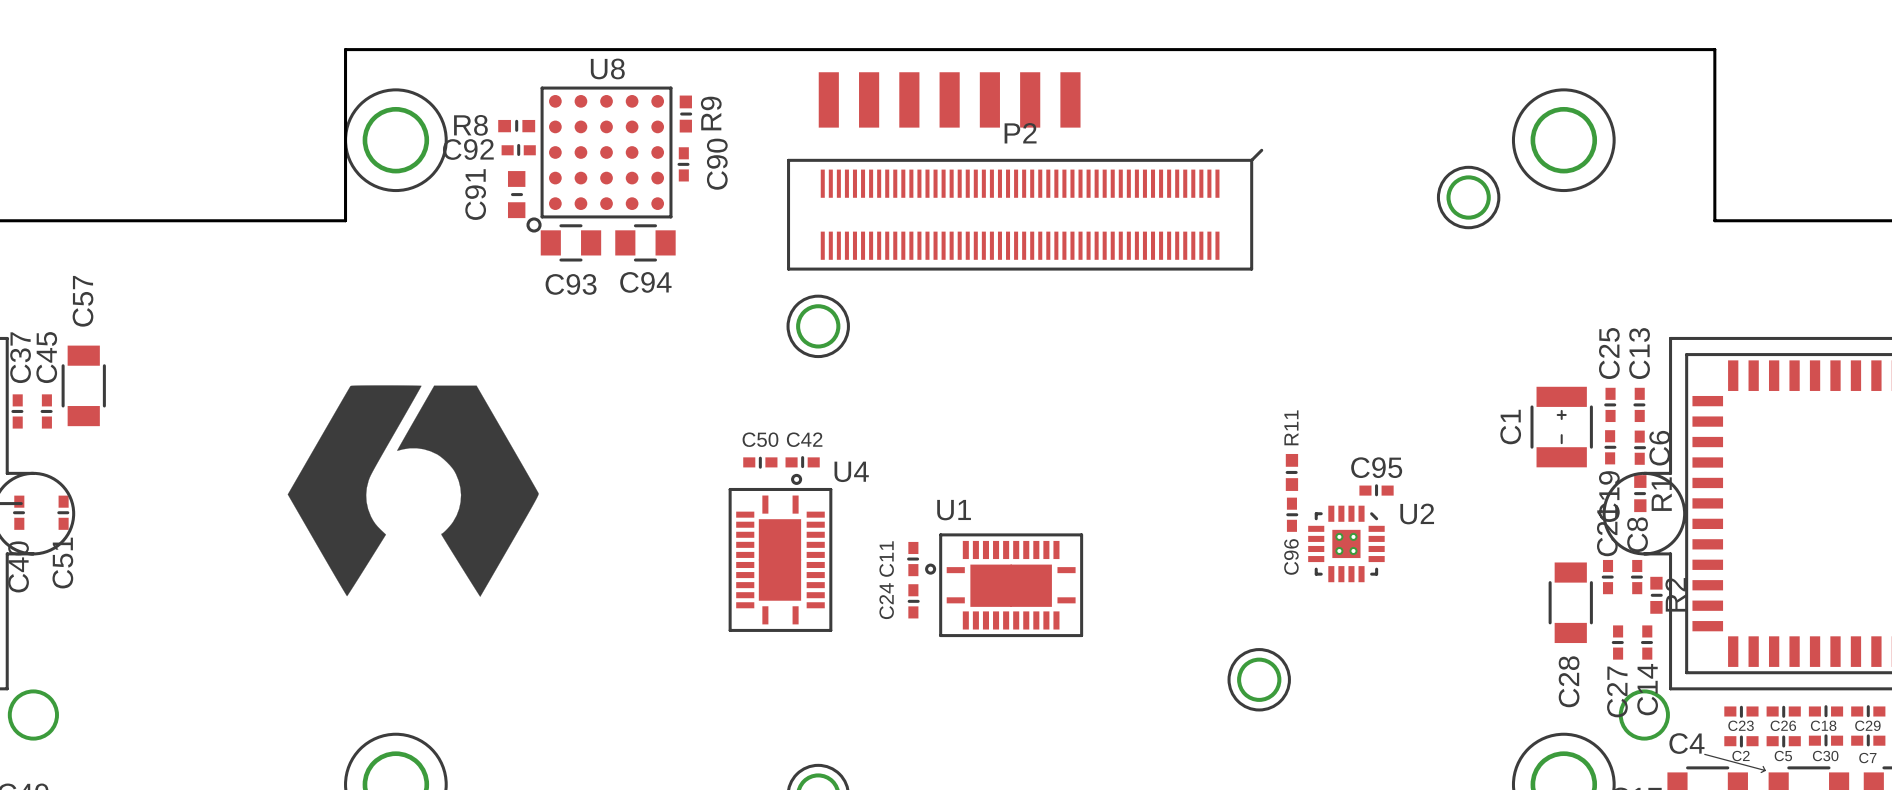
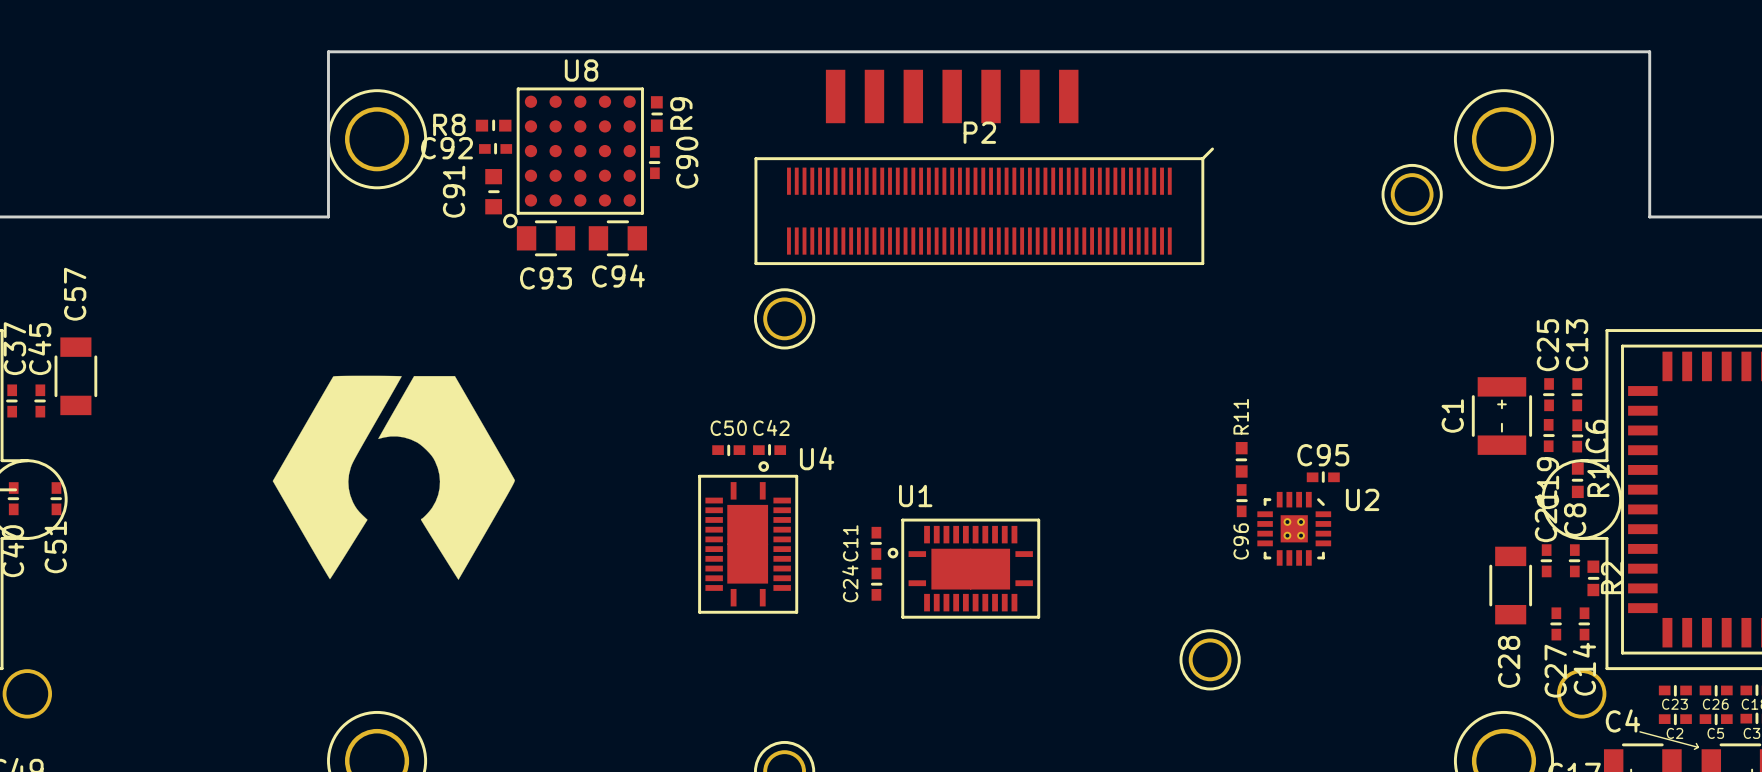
part position: (949, 99) -> (952, 96)

